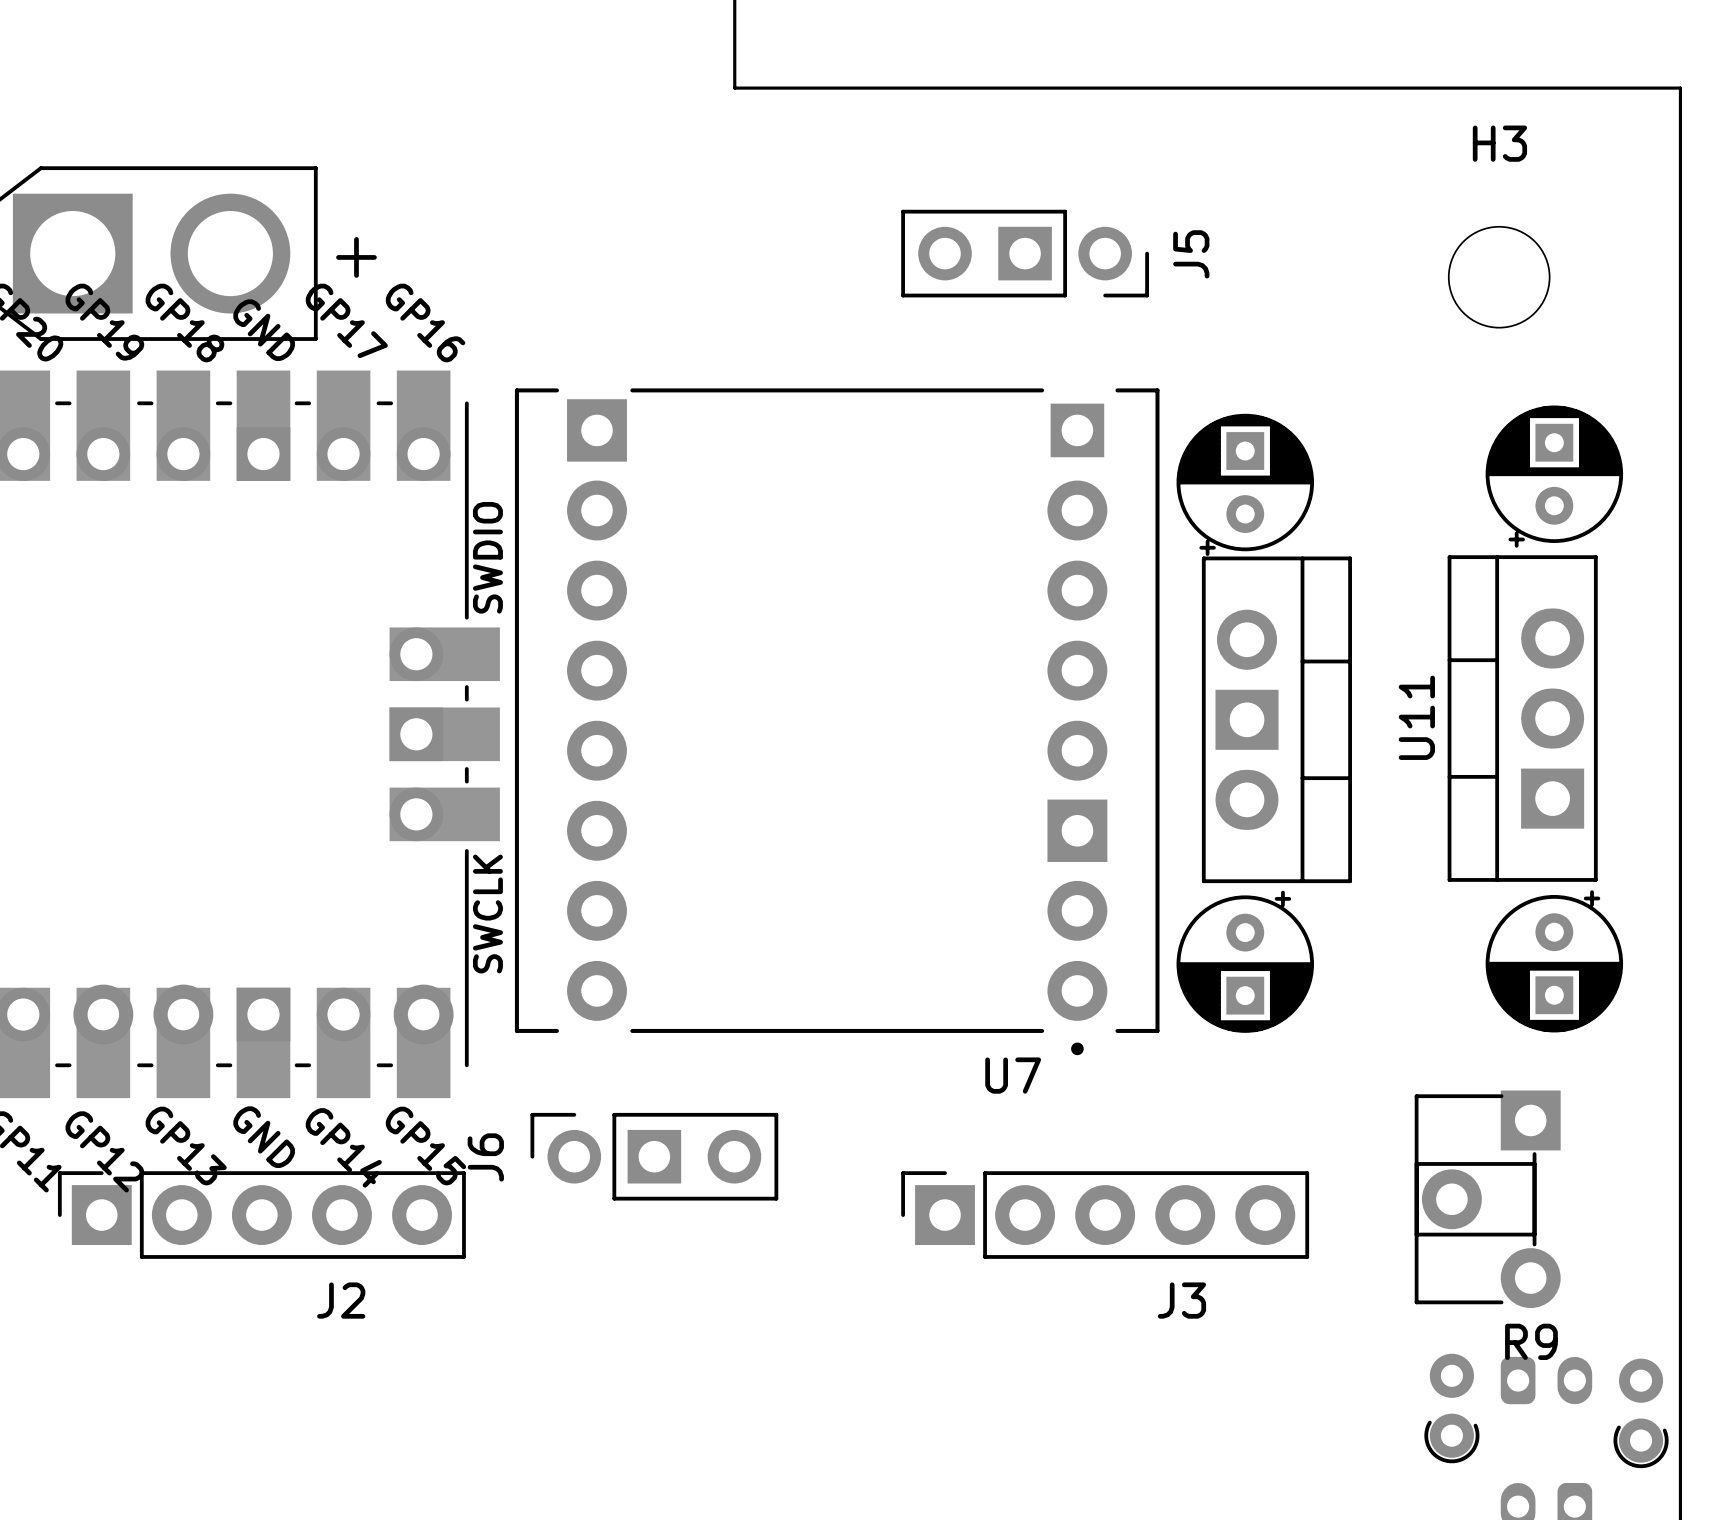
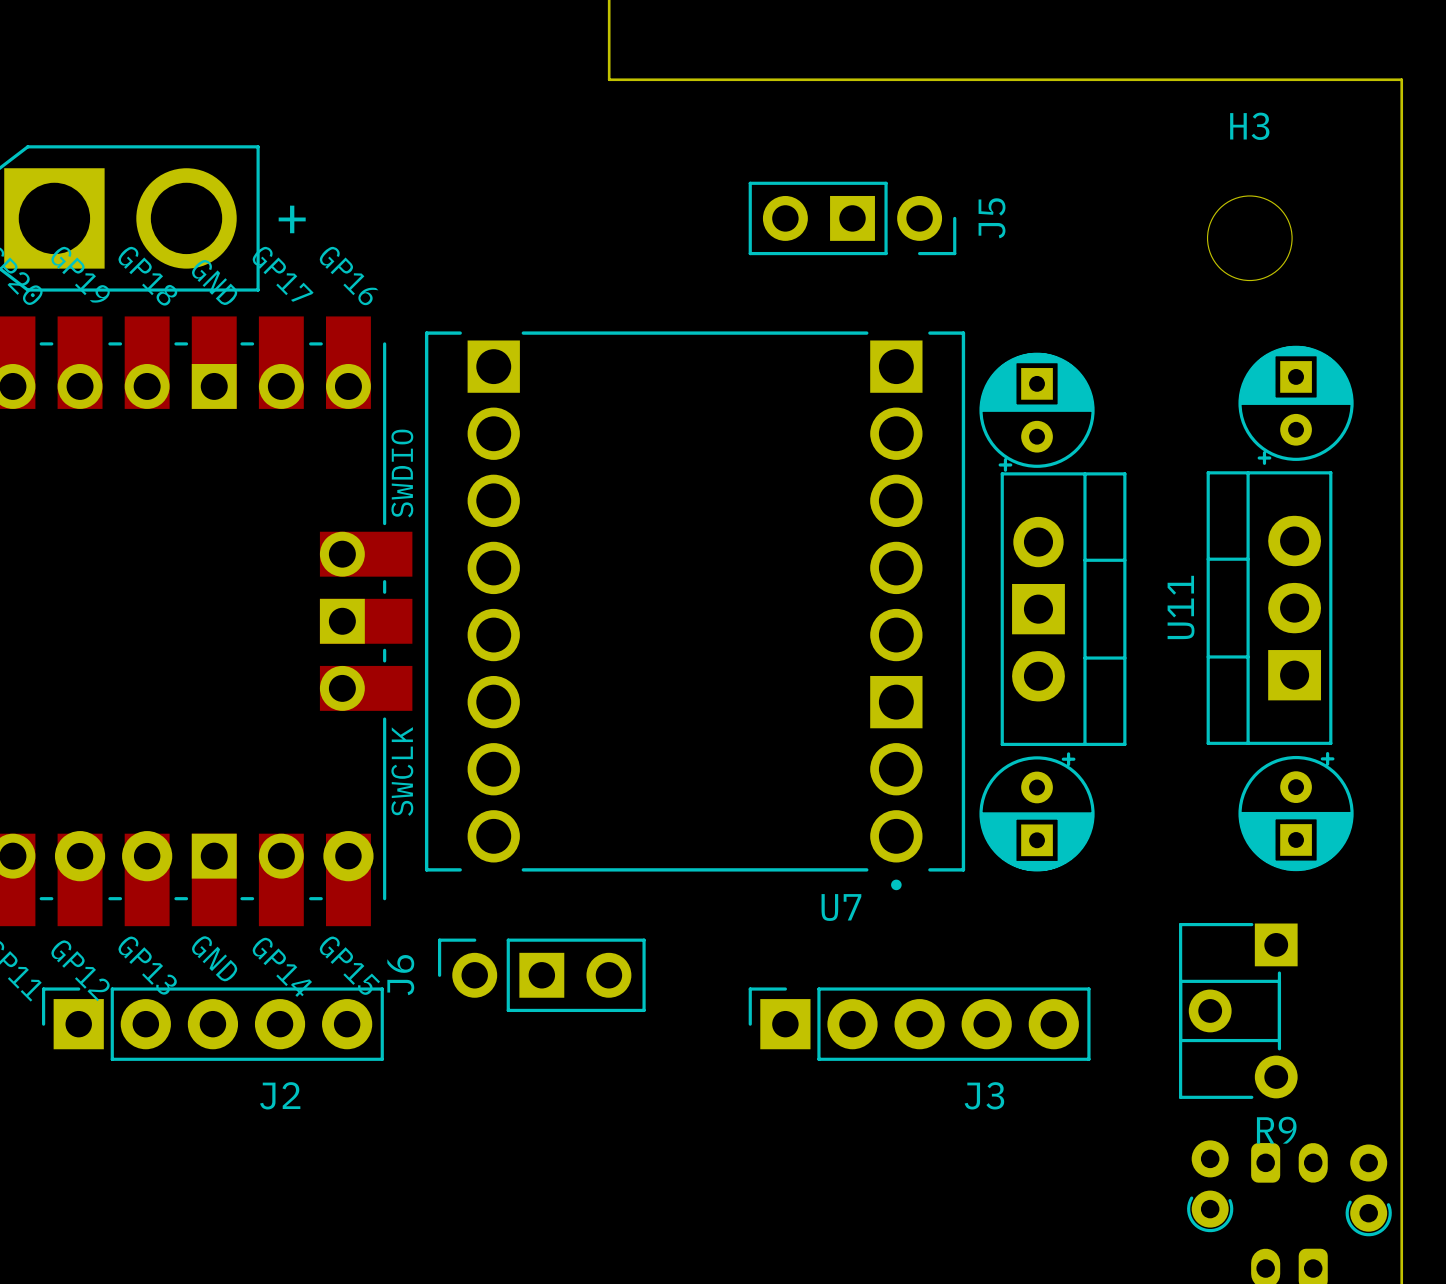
U7 footprint: [514, 388, 1160, 1056] -> [424, 331, 966, 891]
R9 footprint: [1414, 1090, 1561, 1309] -> [1179, 922, 1298, 1099]

